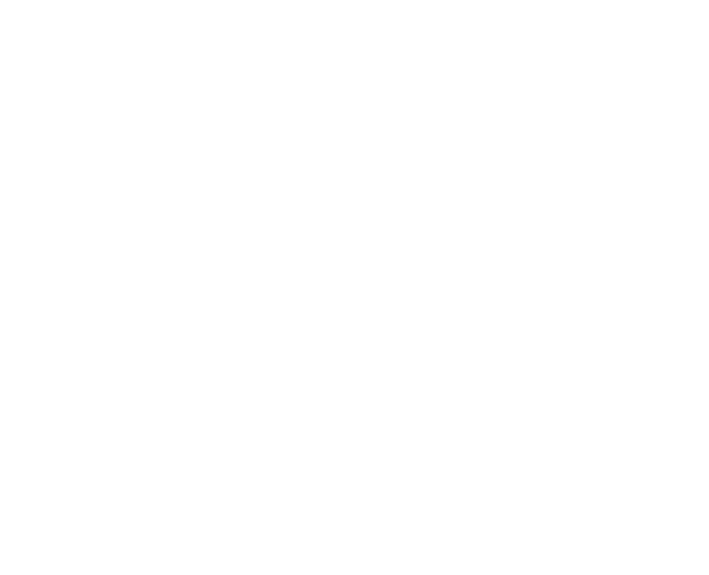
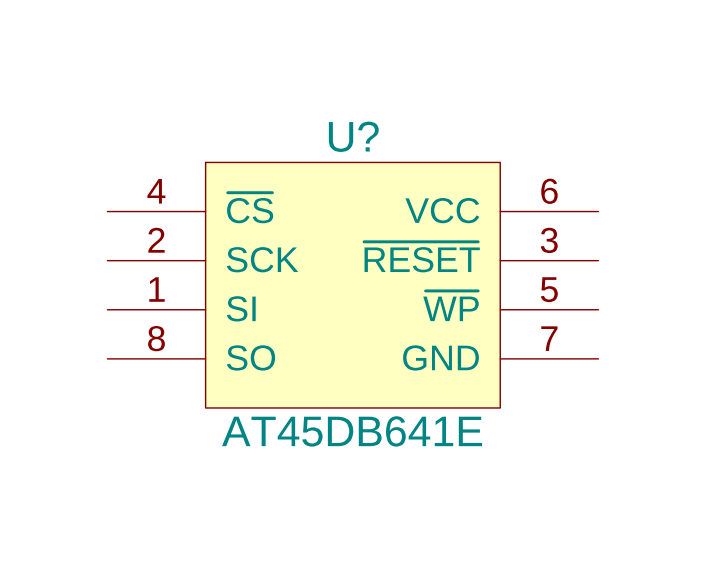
U?: none -> AT45DB641E (352, 285)

